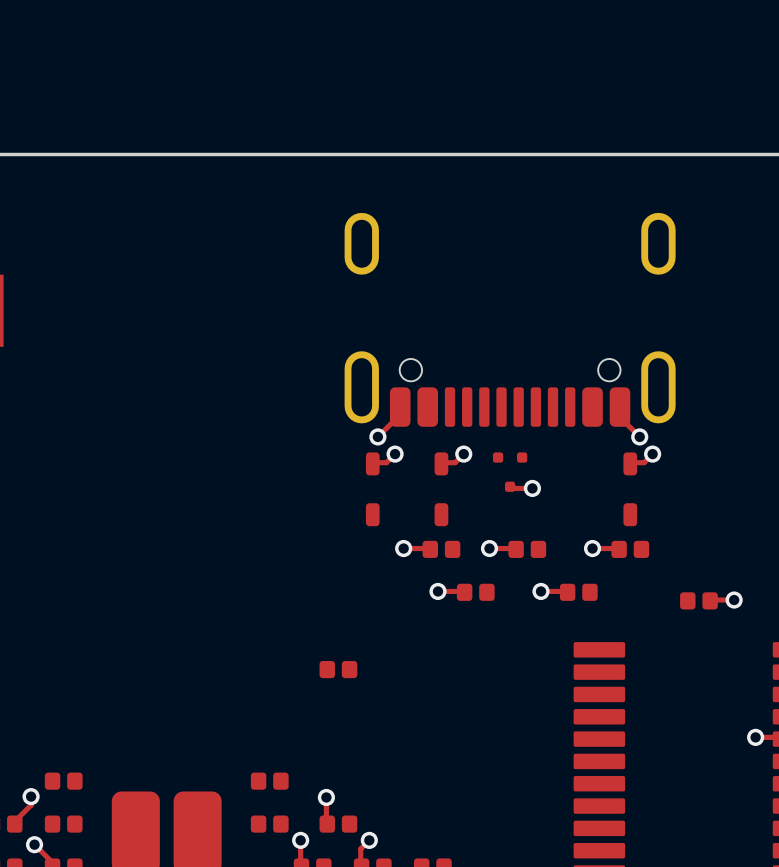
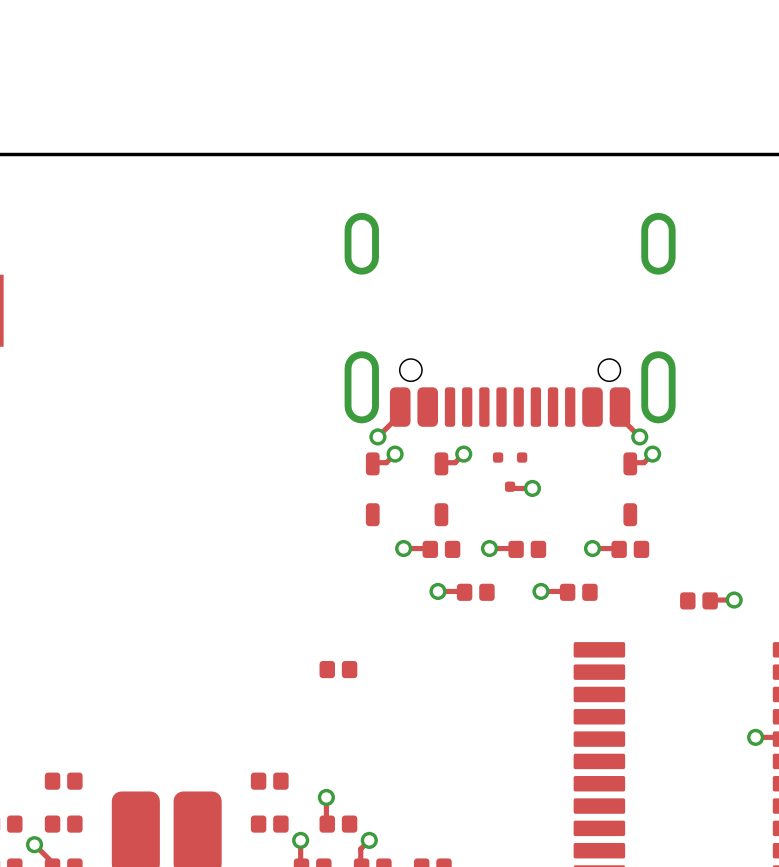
top track: (31, 796) (31, 805) (13, 822) -> none
via: (31, 796) -> none

